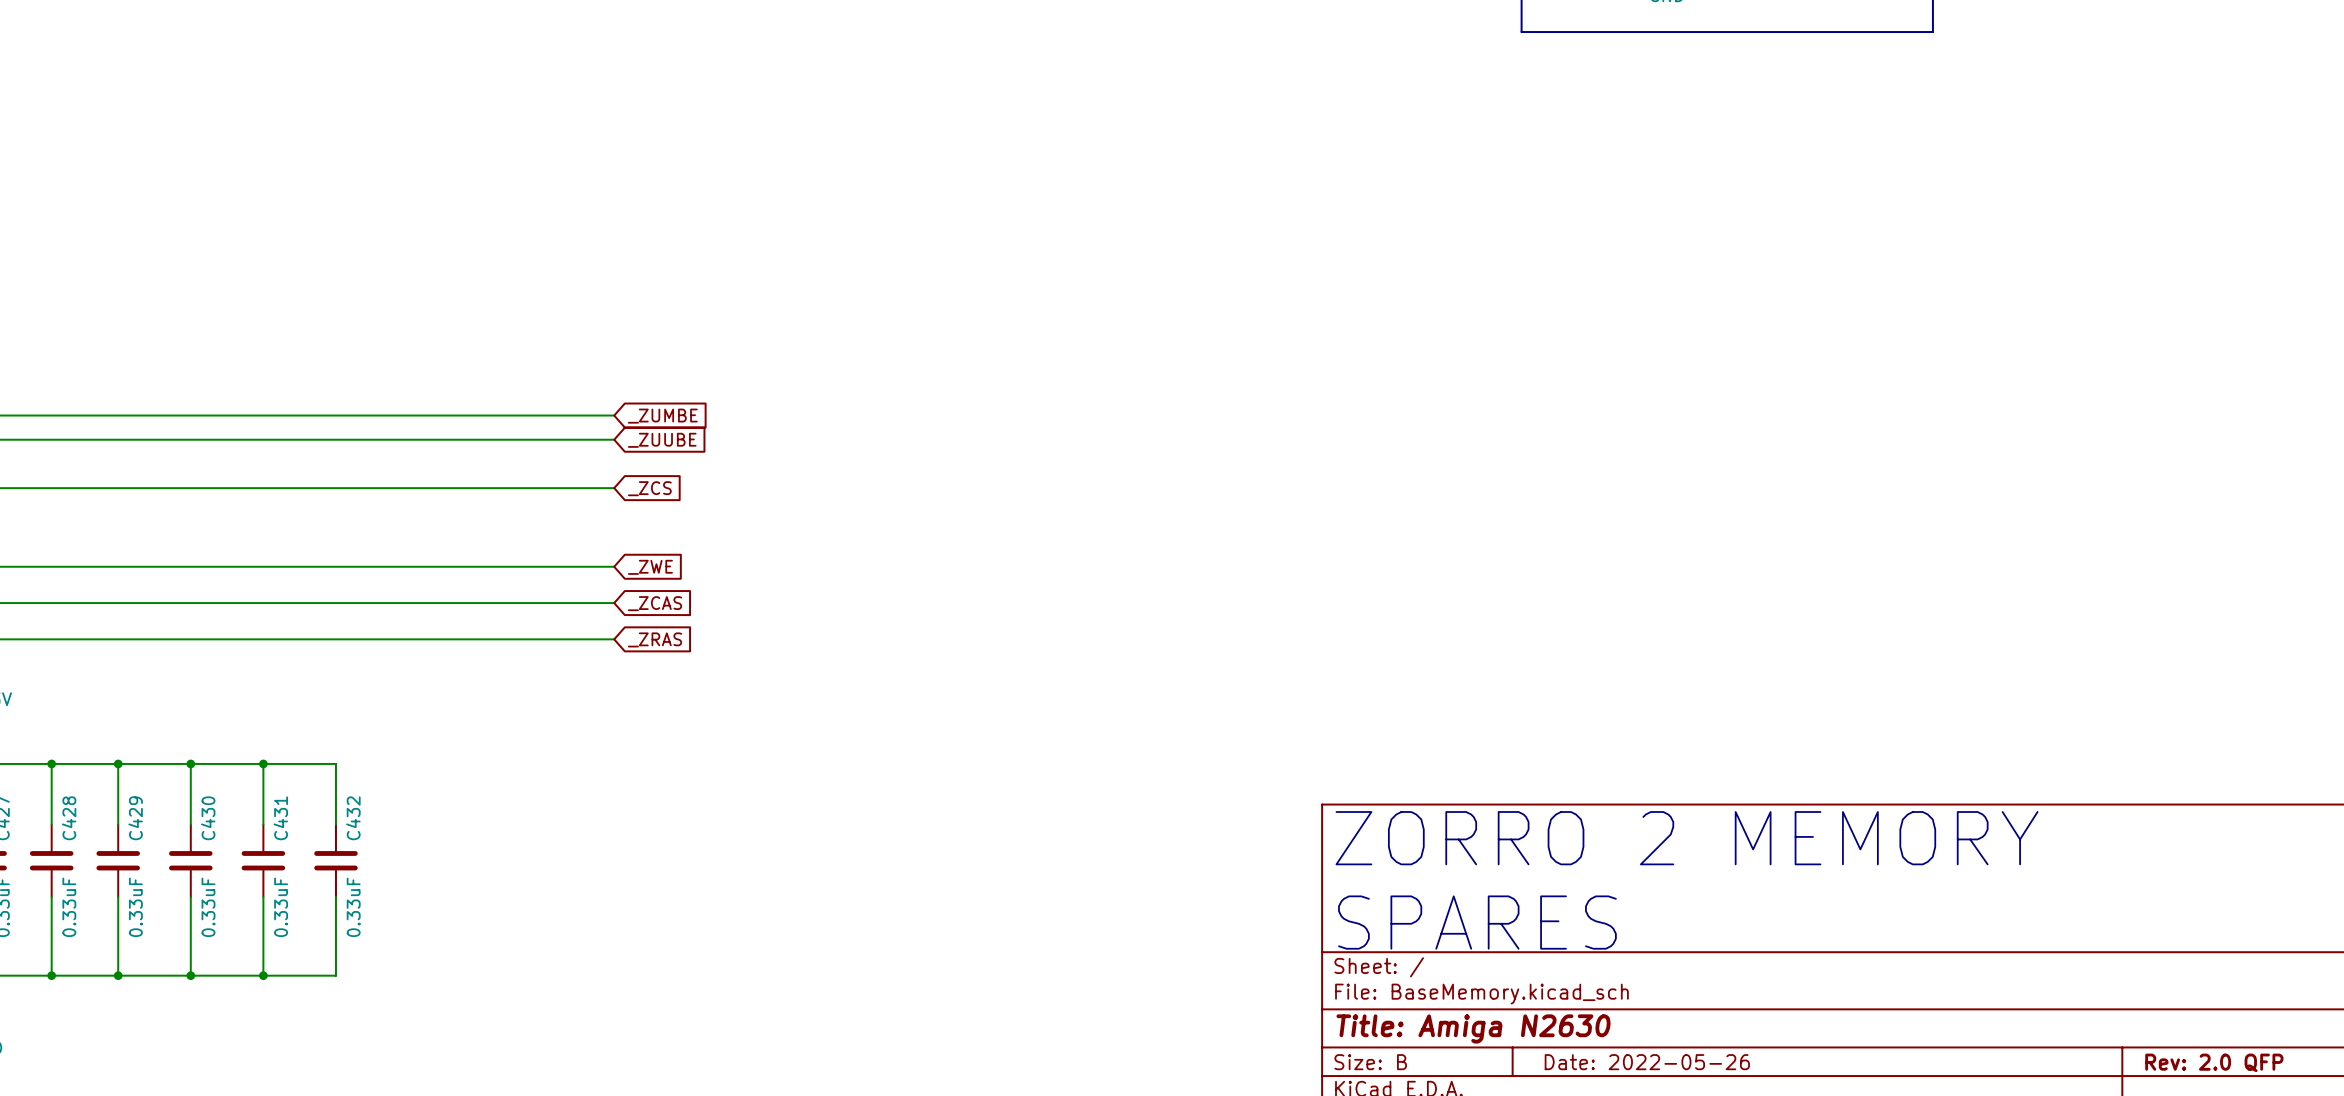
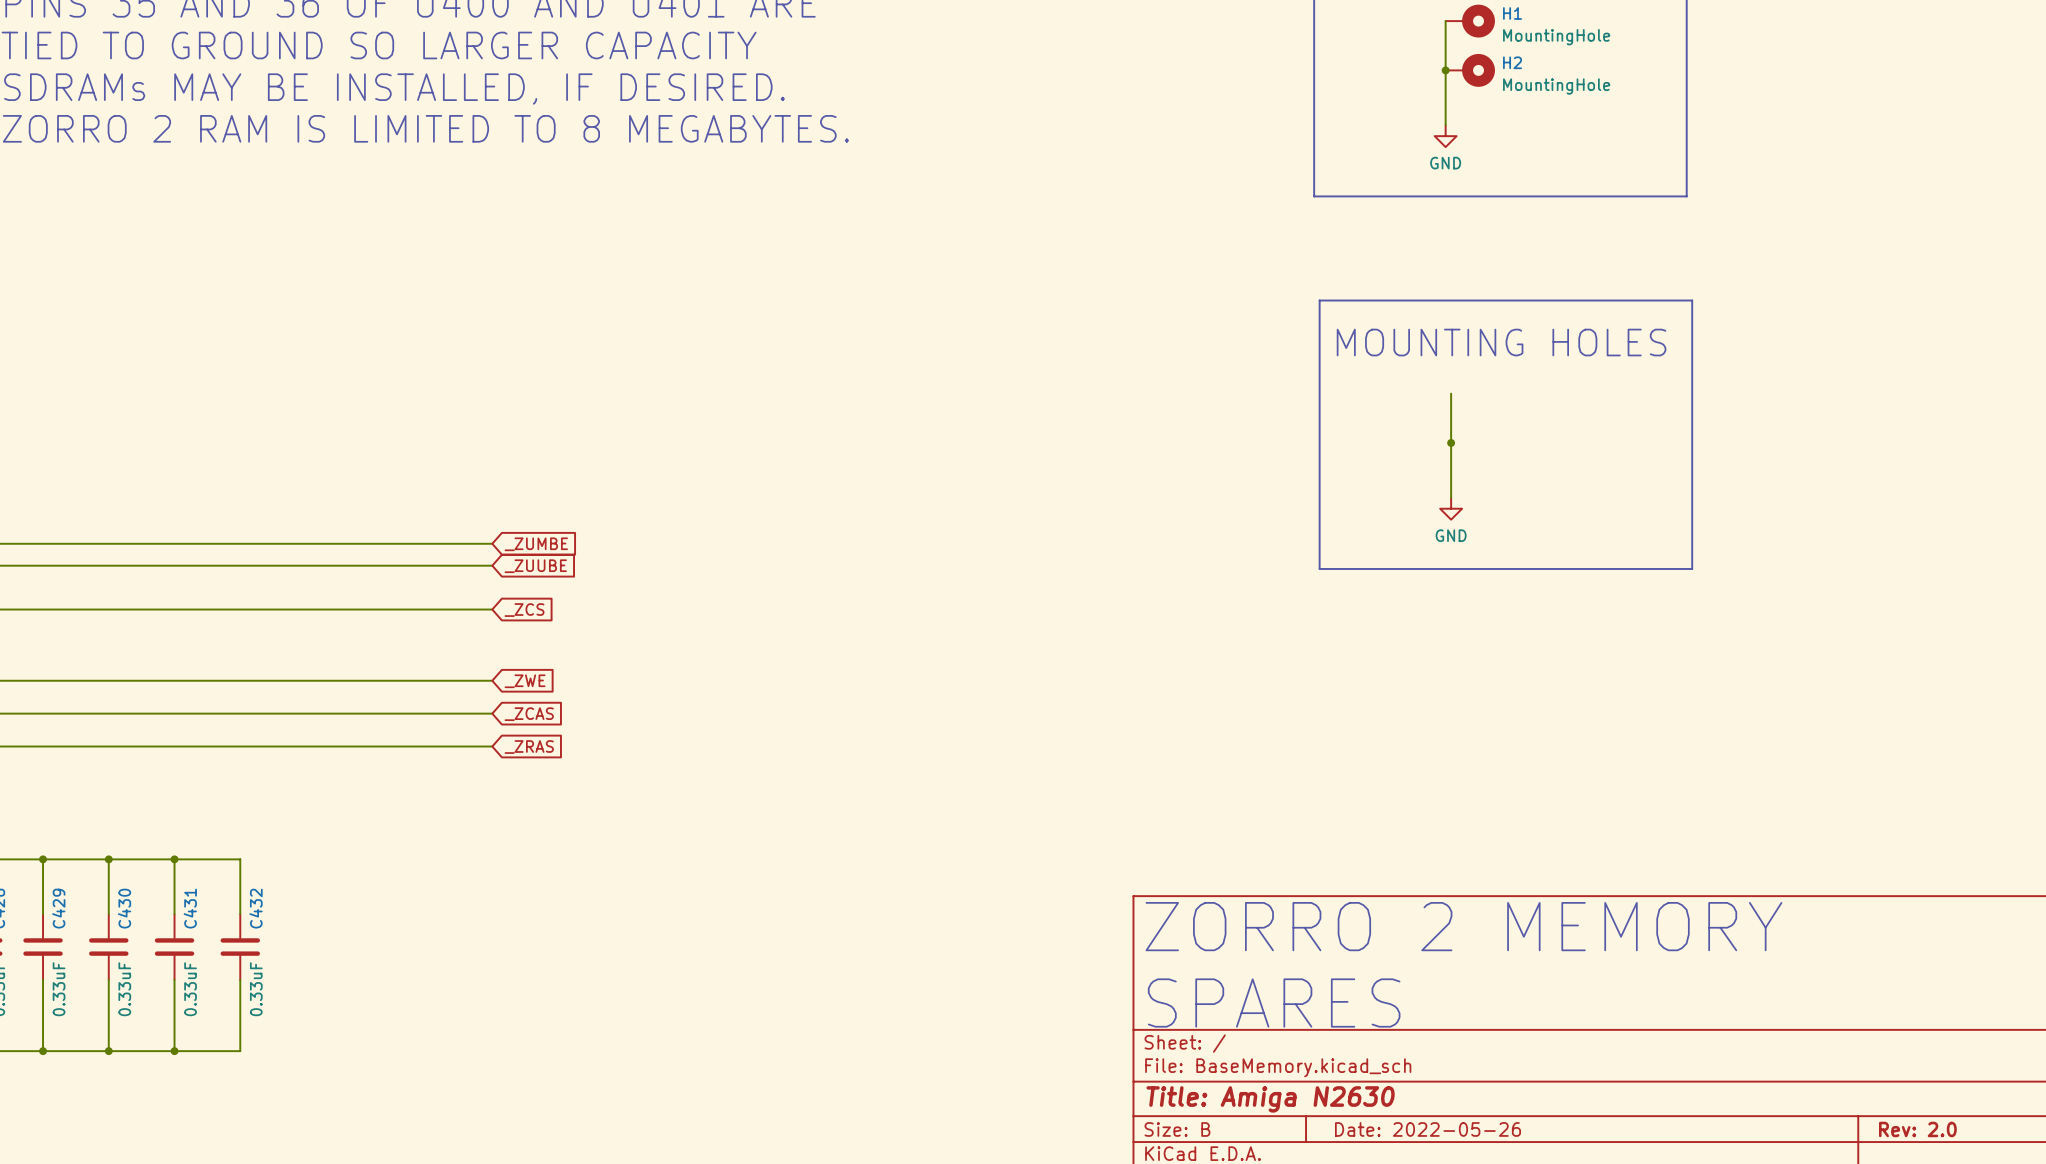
line: none -> (1319, 300) (1319, 568) (1692, 568) (1692, 300) (1319, 300)
text: none -> MOUNTING HOLES (1501, 342)
wire: none -> (1451, 393) (1451, 497)
junction: none -> (1451, 442)
power symbol: none -> GND (1451, 508)
title block: Rev: 2.0 QFP (2214, 1062) -> Rev: 2.0 (1917, 1129)

